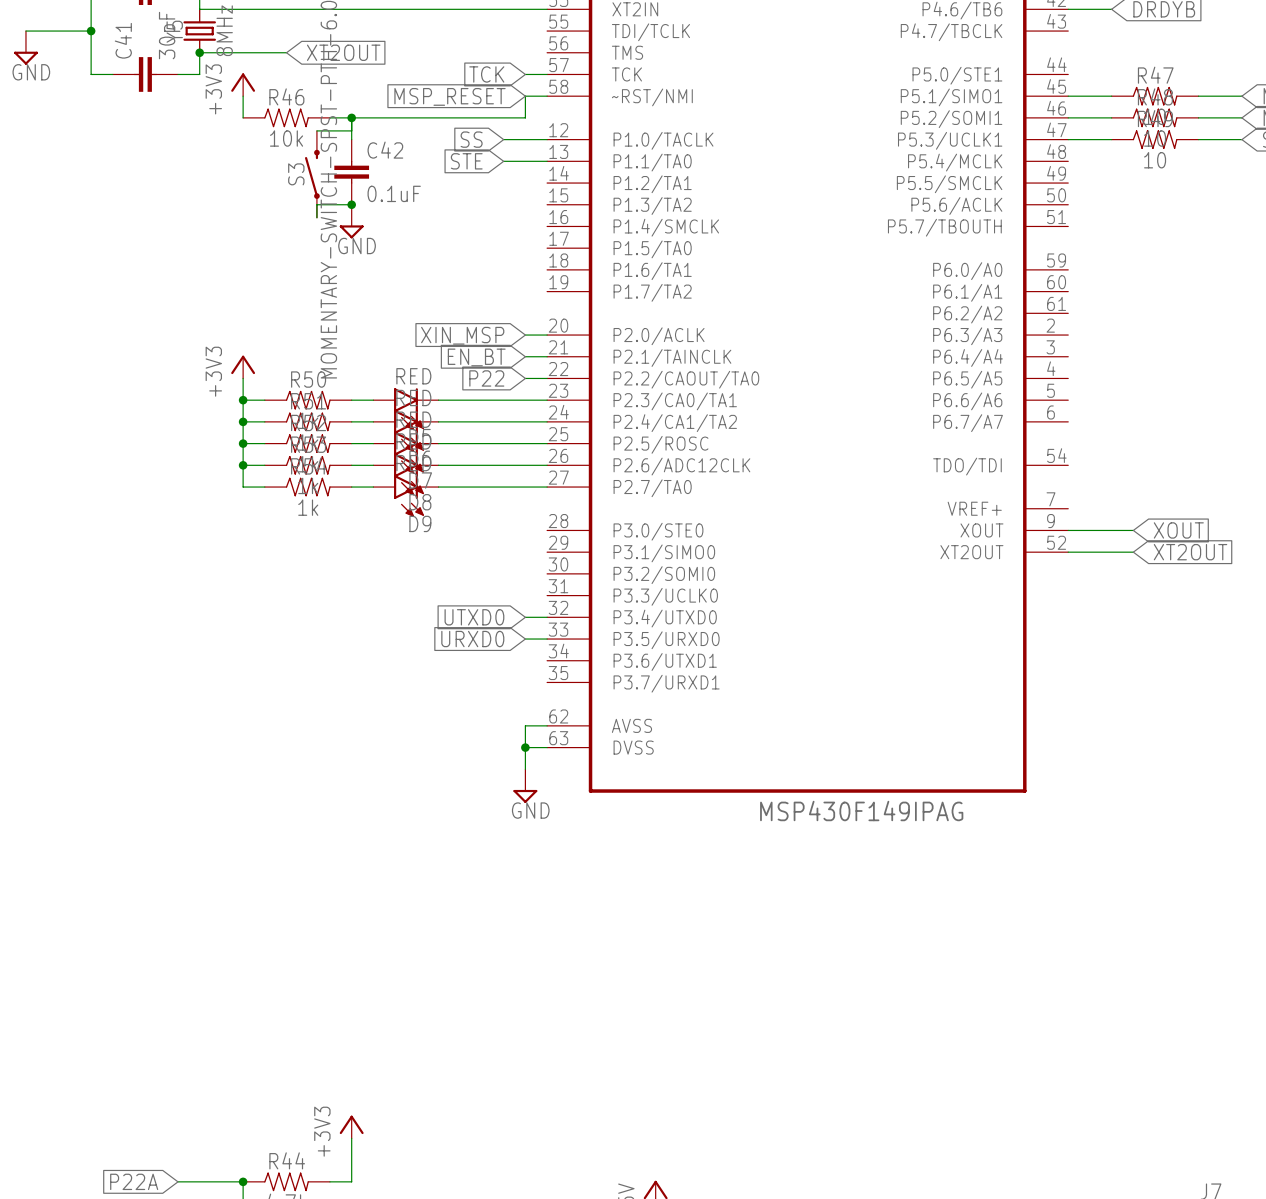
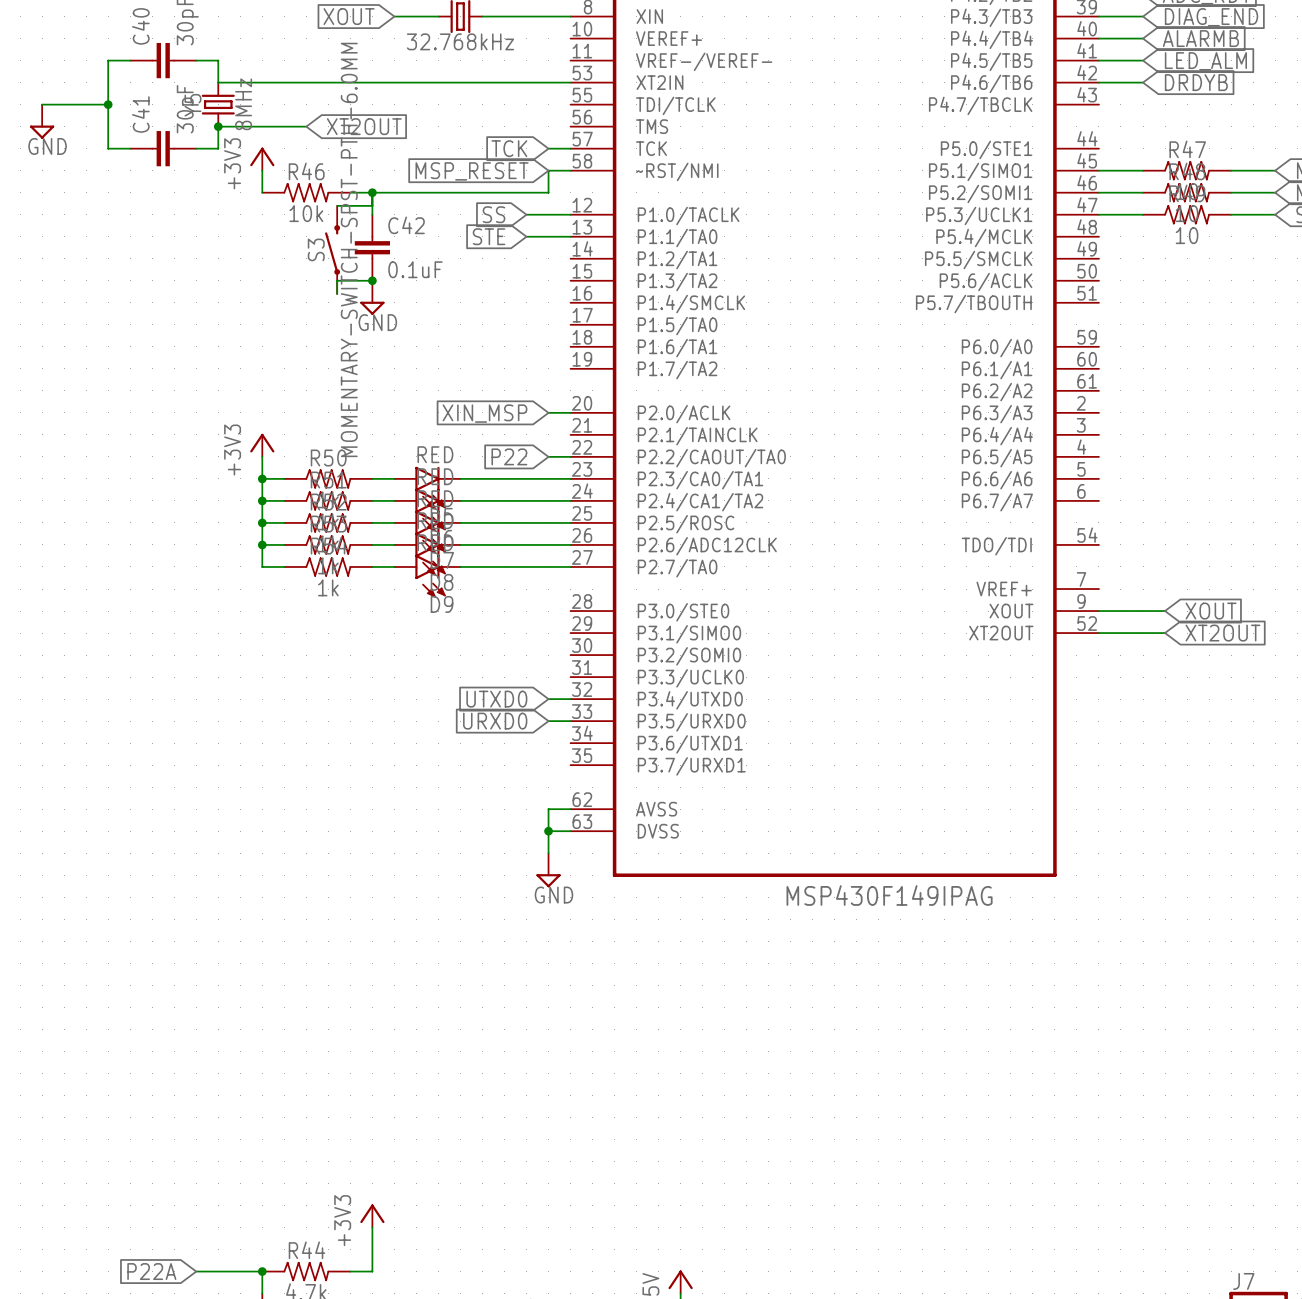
wire: (525, 356) (547, 356) -> none
global label: EN_BT (476, 357) -> none

